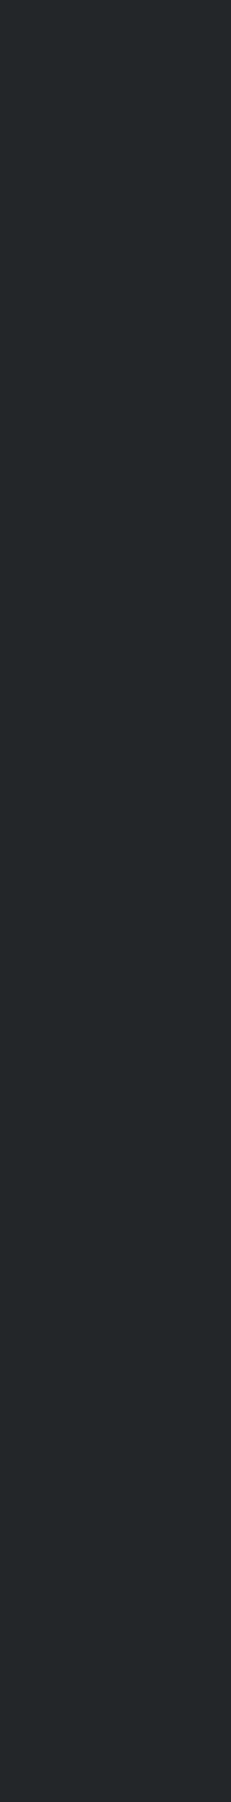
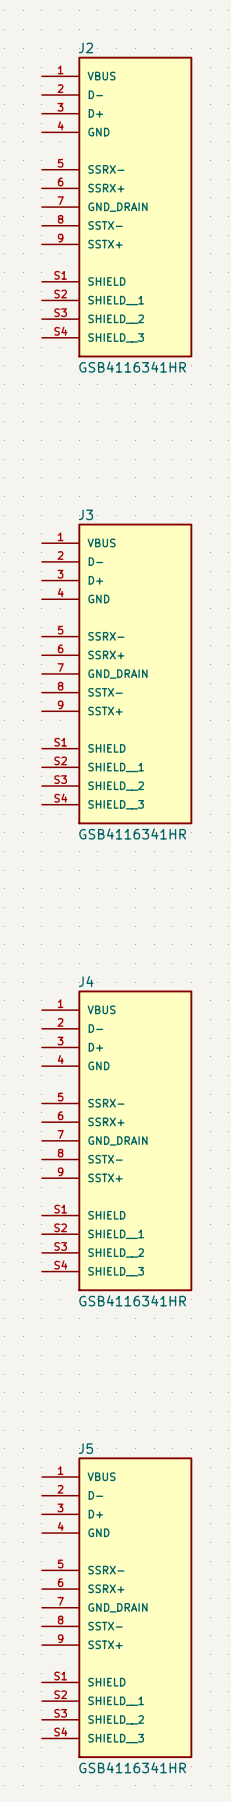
J2: none -> GSB4116341HR (117, 207)
J3: none -> GSB4116341HR (117, 673)
J4: none -> GSB4116341HR (117, 1140)
J5: none -> GSB4116341HR (117, 1607)

